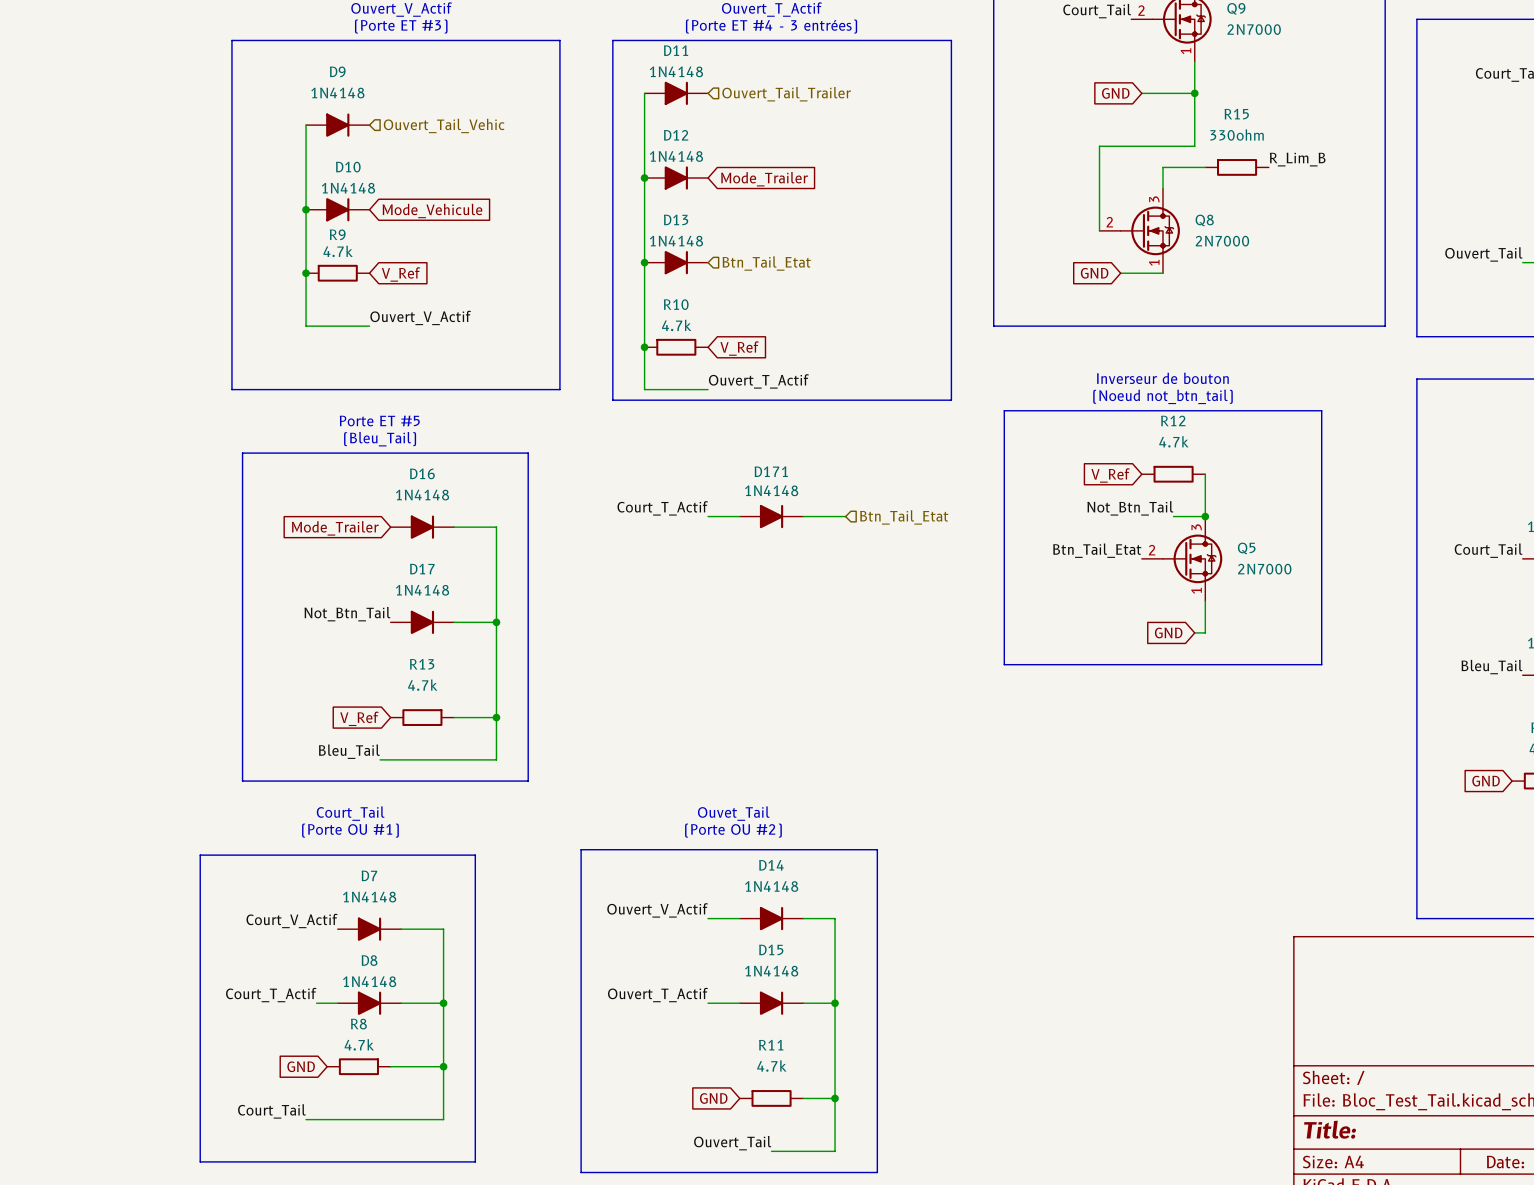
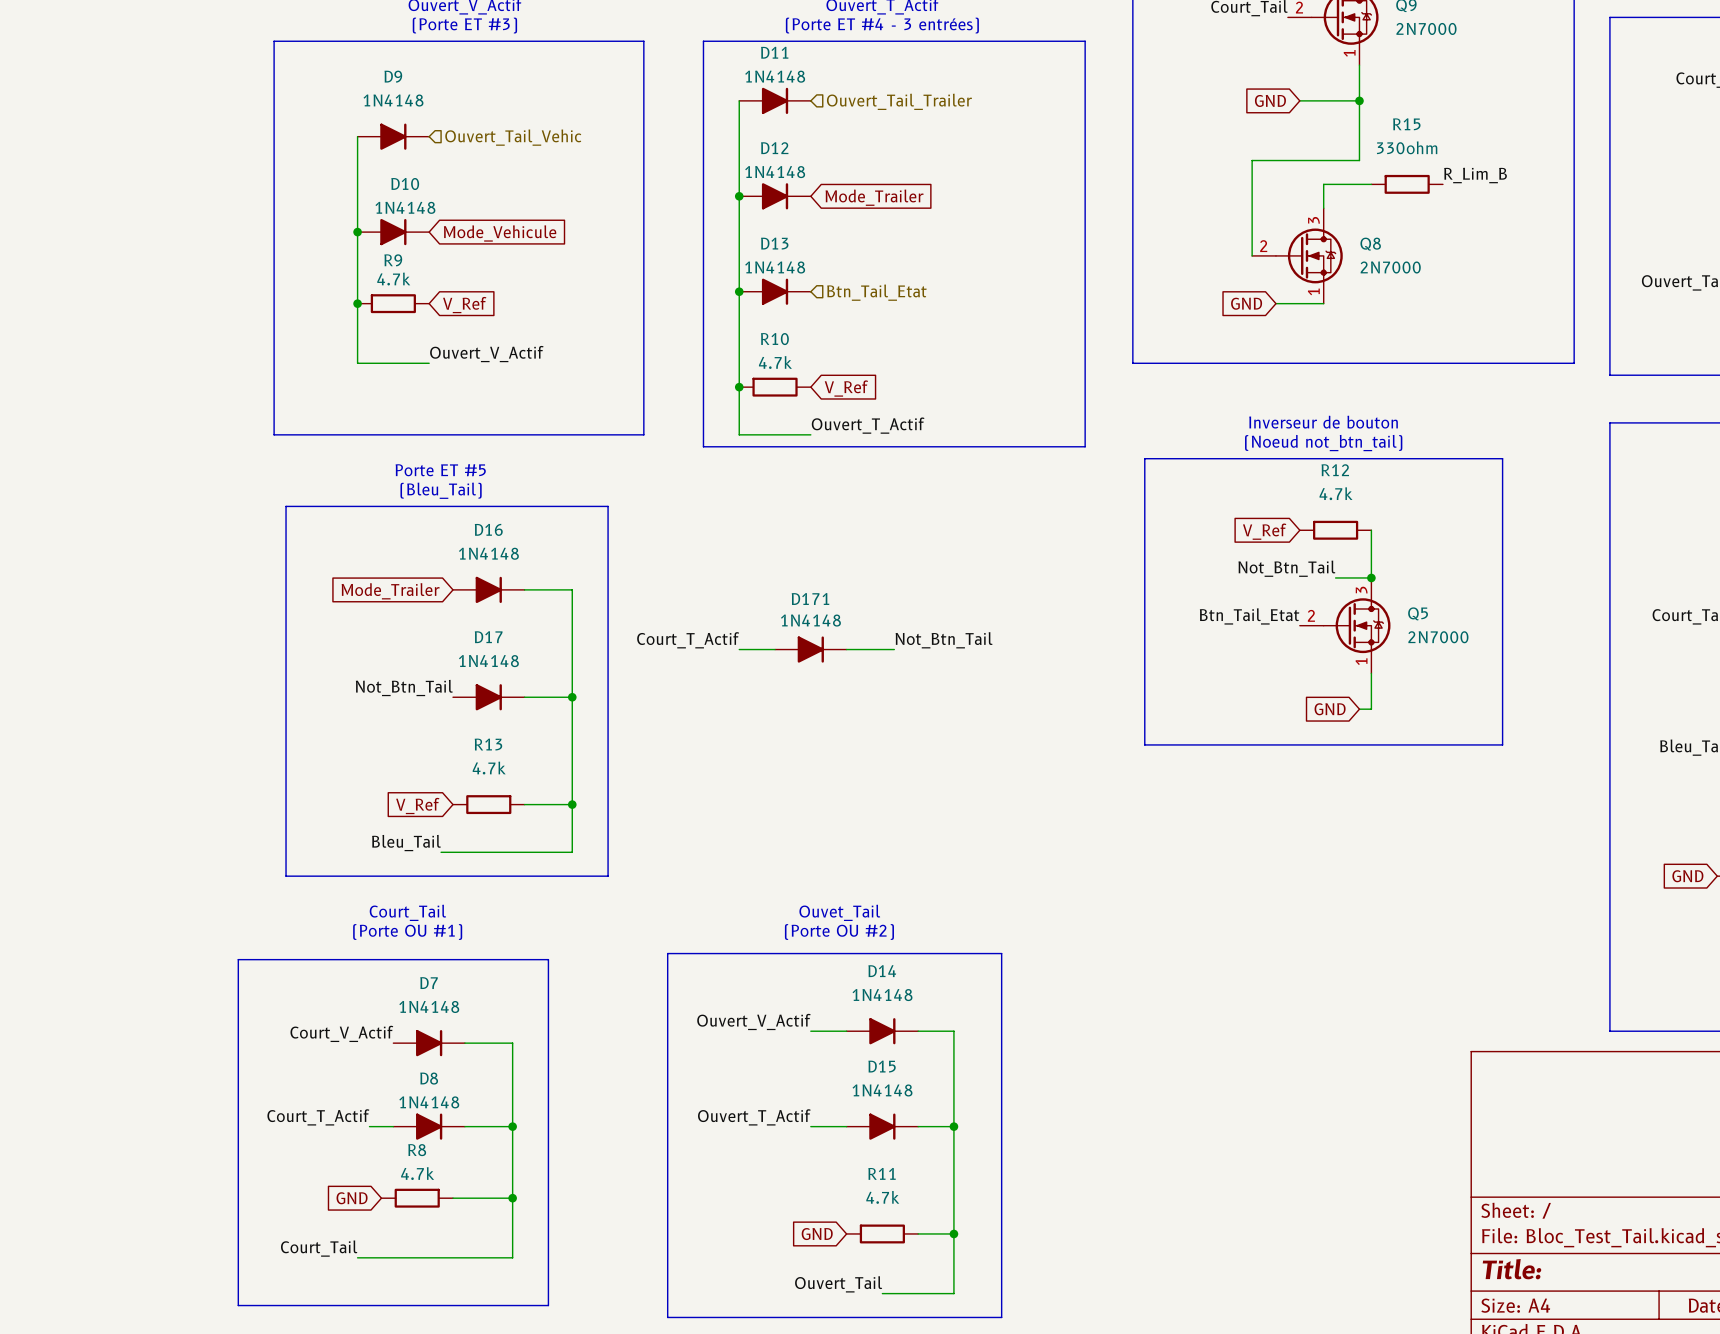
label position: Court_T_Actif (662, 508) -> Court_T_Actif (688, 640)
wire: (708, 516) (739, 516) -> (739, 649) (775, 649)
D171 position: (771, 516) -> (810, 649)
wire: (803, 516) (845, 516) -> (846, 649) (894, 649)
hierarchical label: Btn_Tail_Etat (904, 517) -> none
label: none -> Not_Btn_Tail (944, 640)

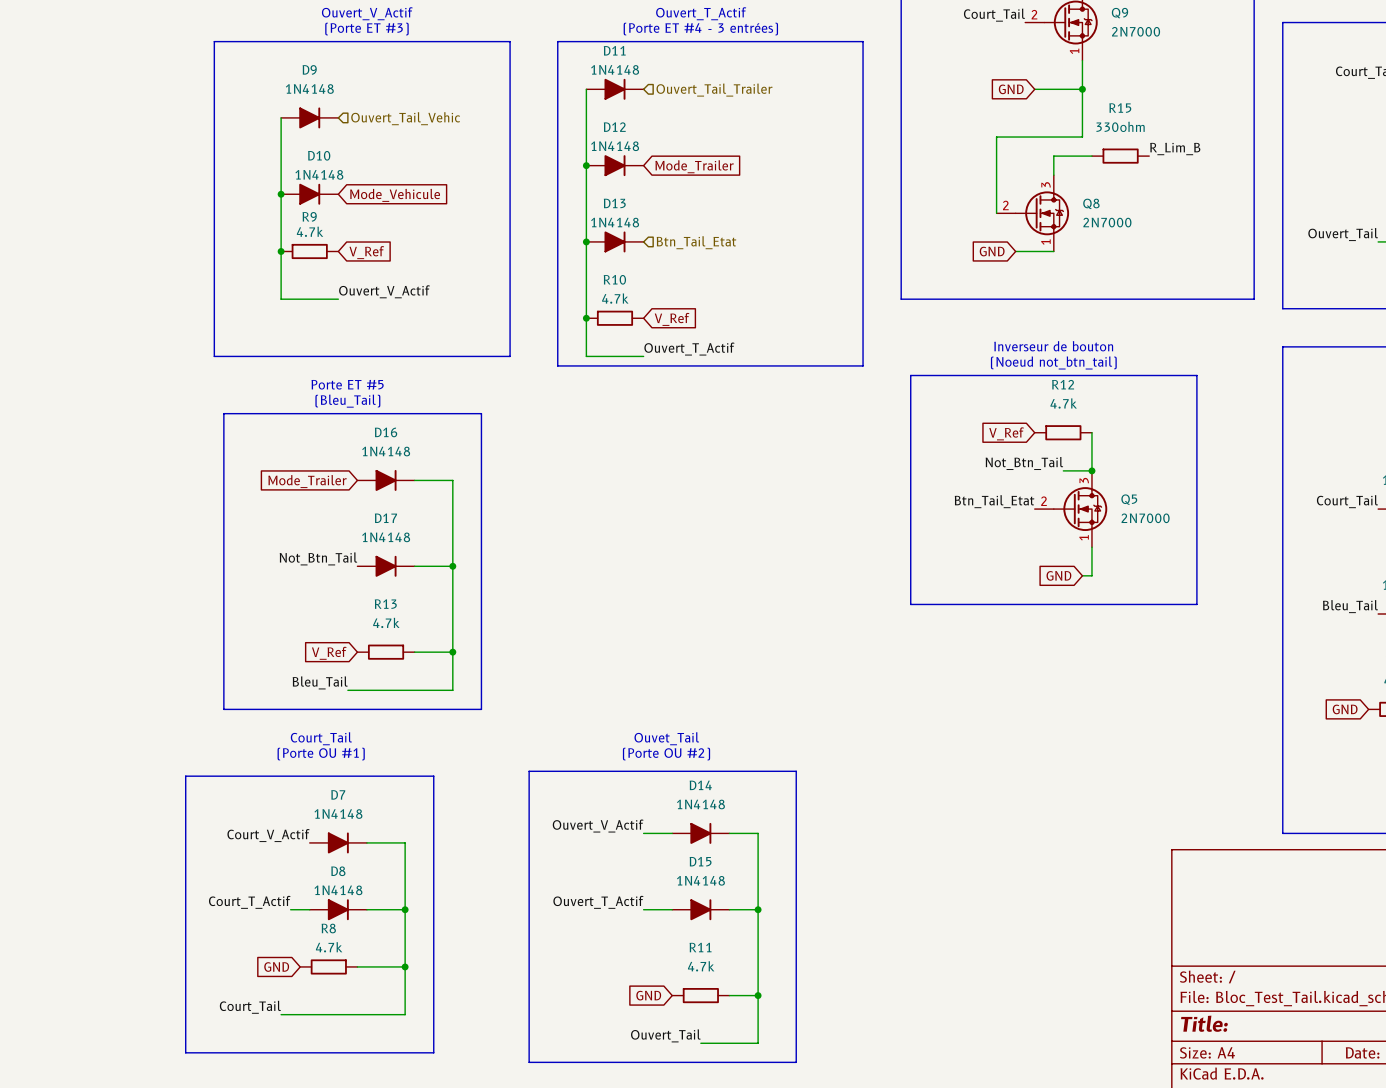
label: Court_T_Actif (688, 640) -> none
label: Not_Btn_Tail (944, 640) -> none
wire: (739, 649) (775, 649) -> none
D171: 1N4148 (810, 649) -> none
wire: (846, 649) (894, 649) -> none

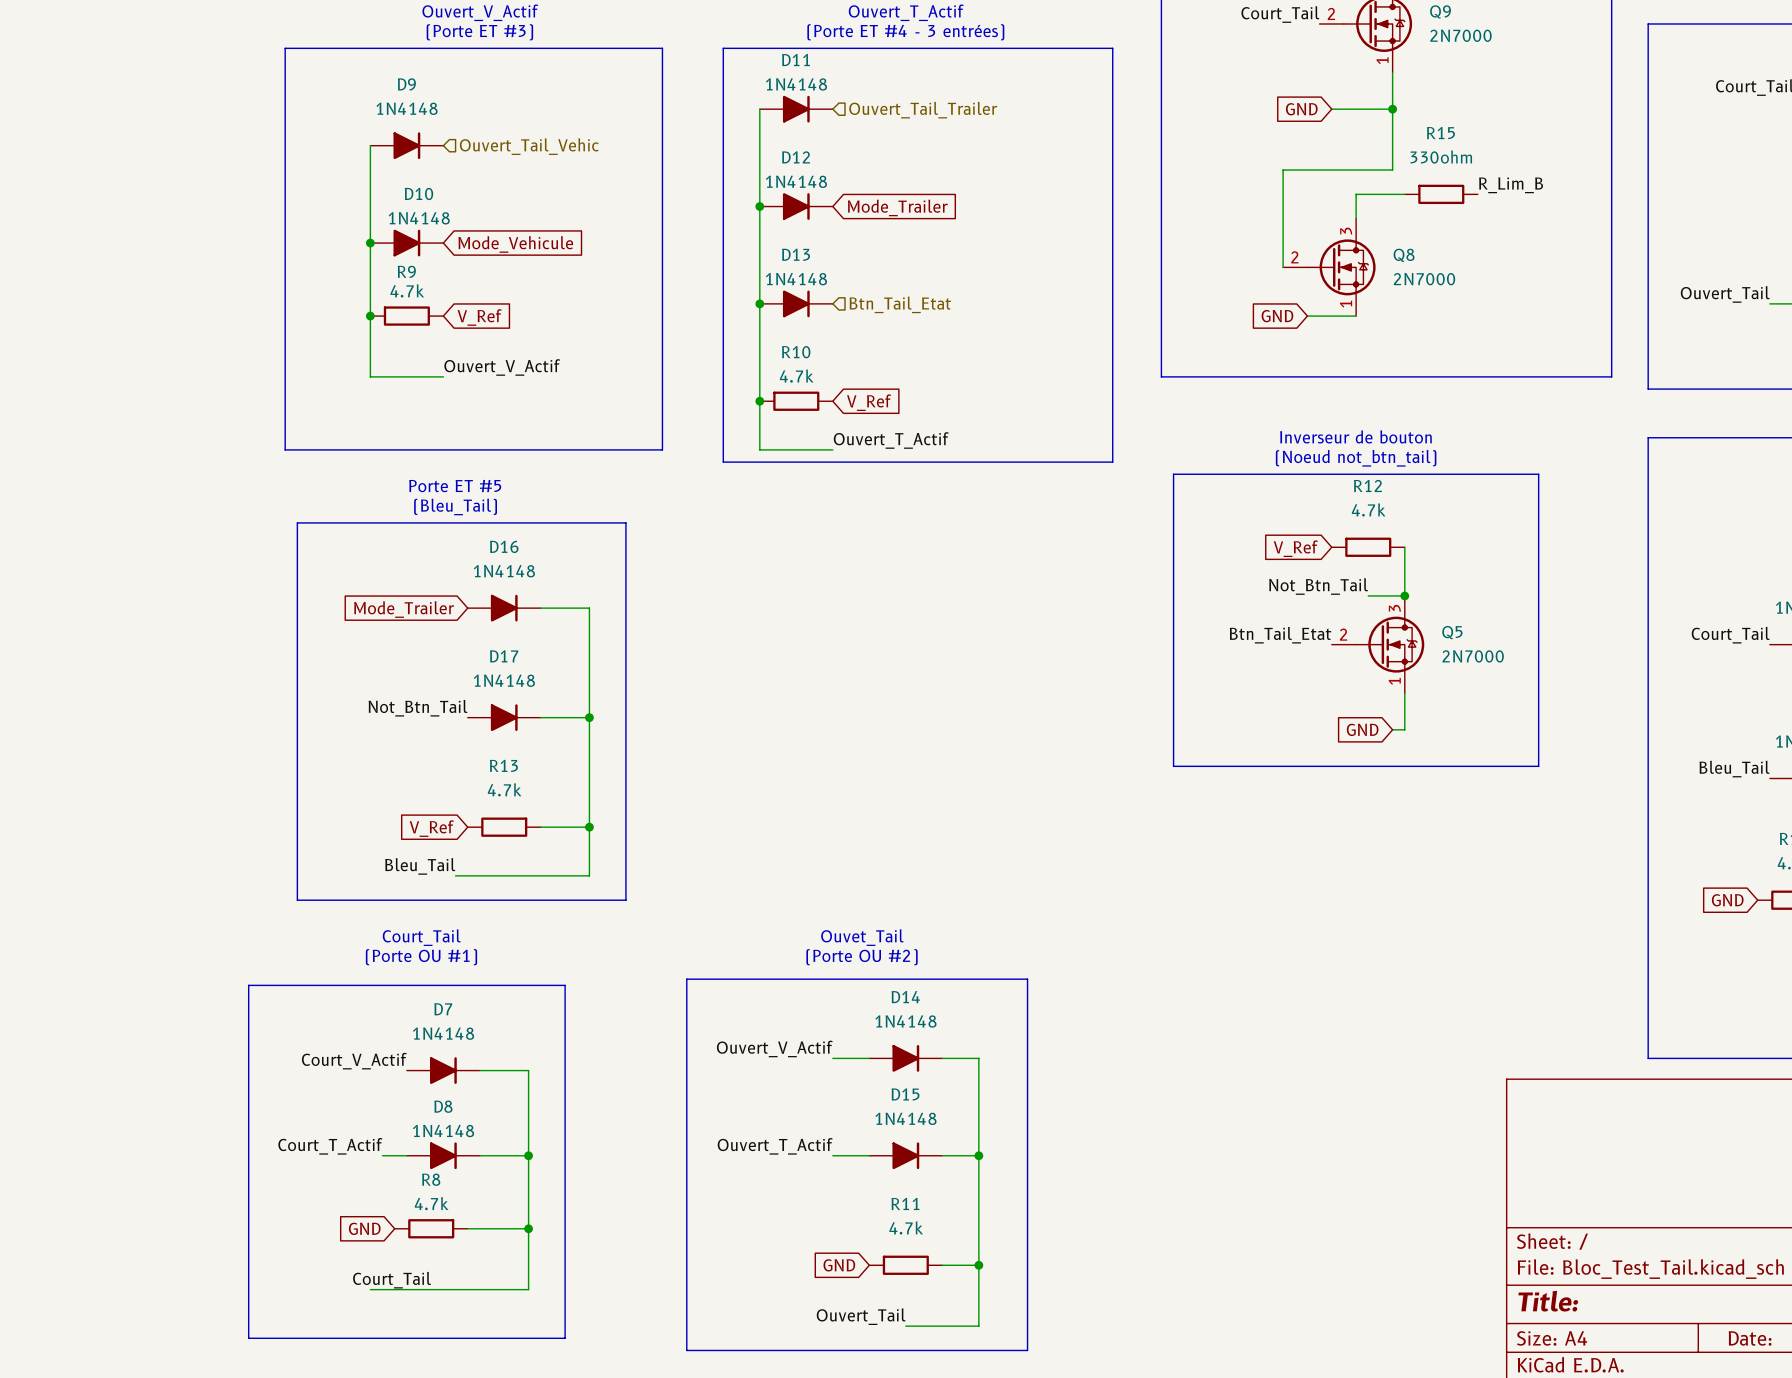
label position: Court_Tail (250, 1007) -> Court_Tail (392, 1280)

